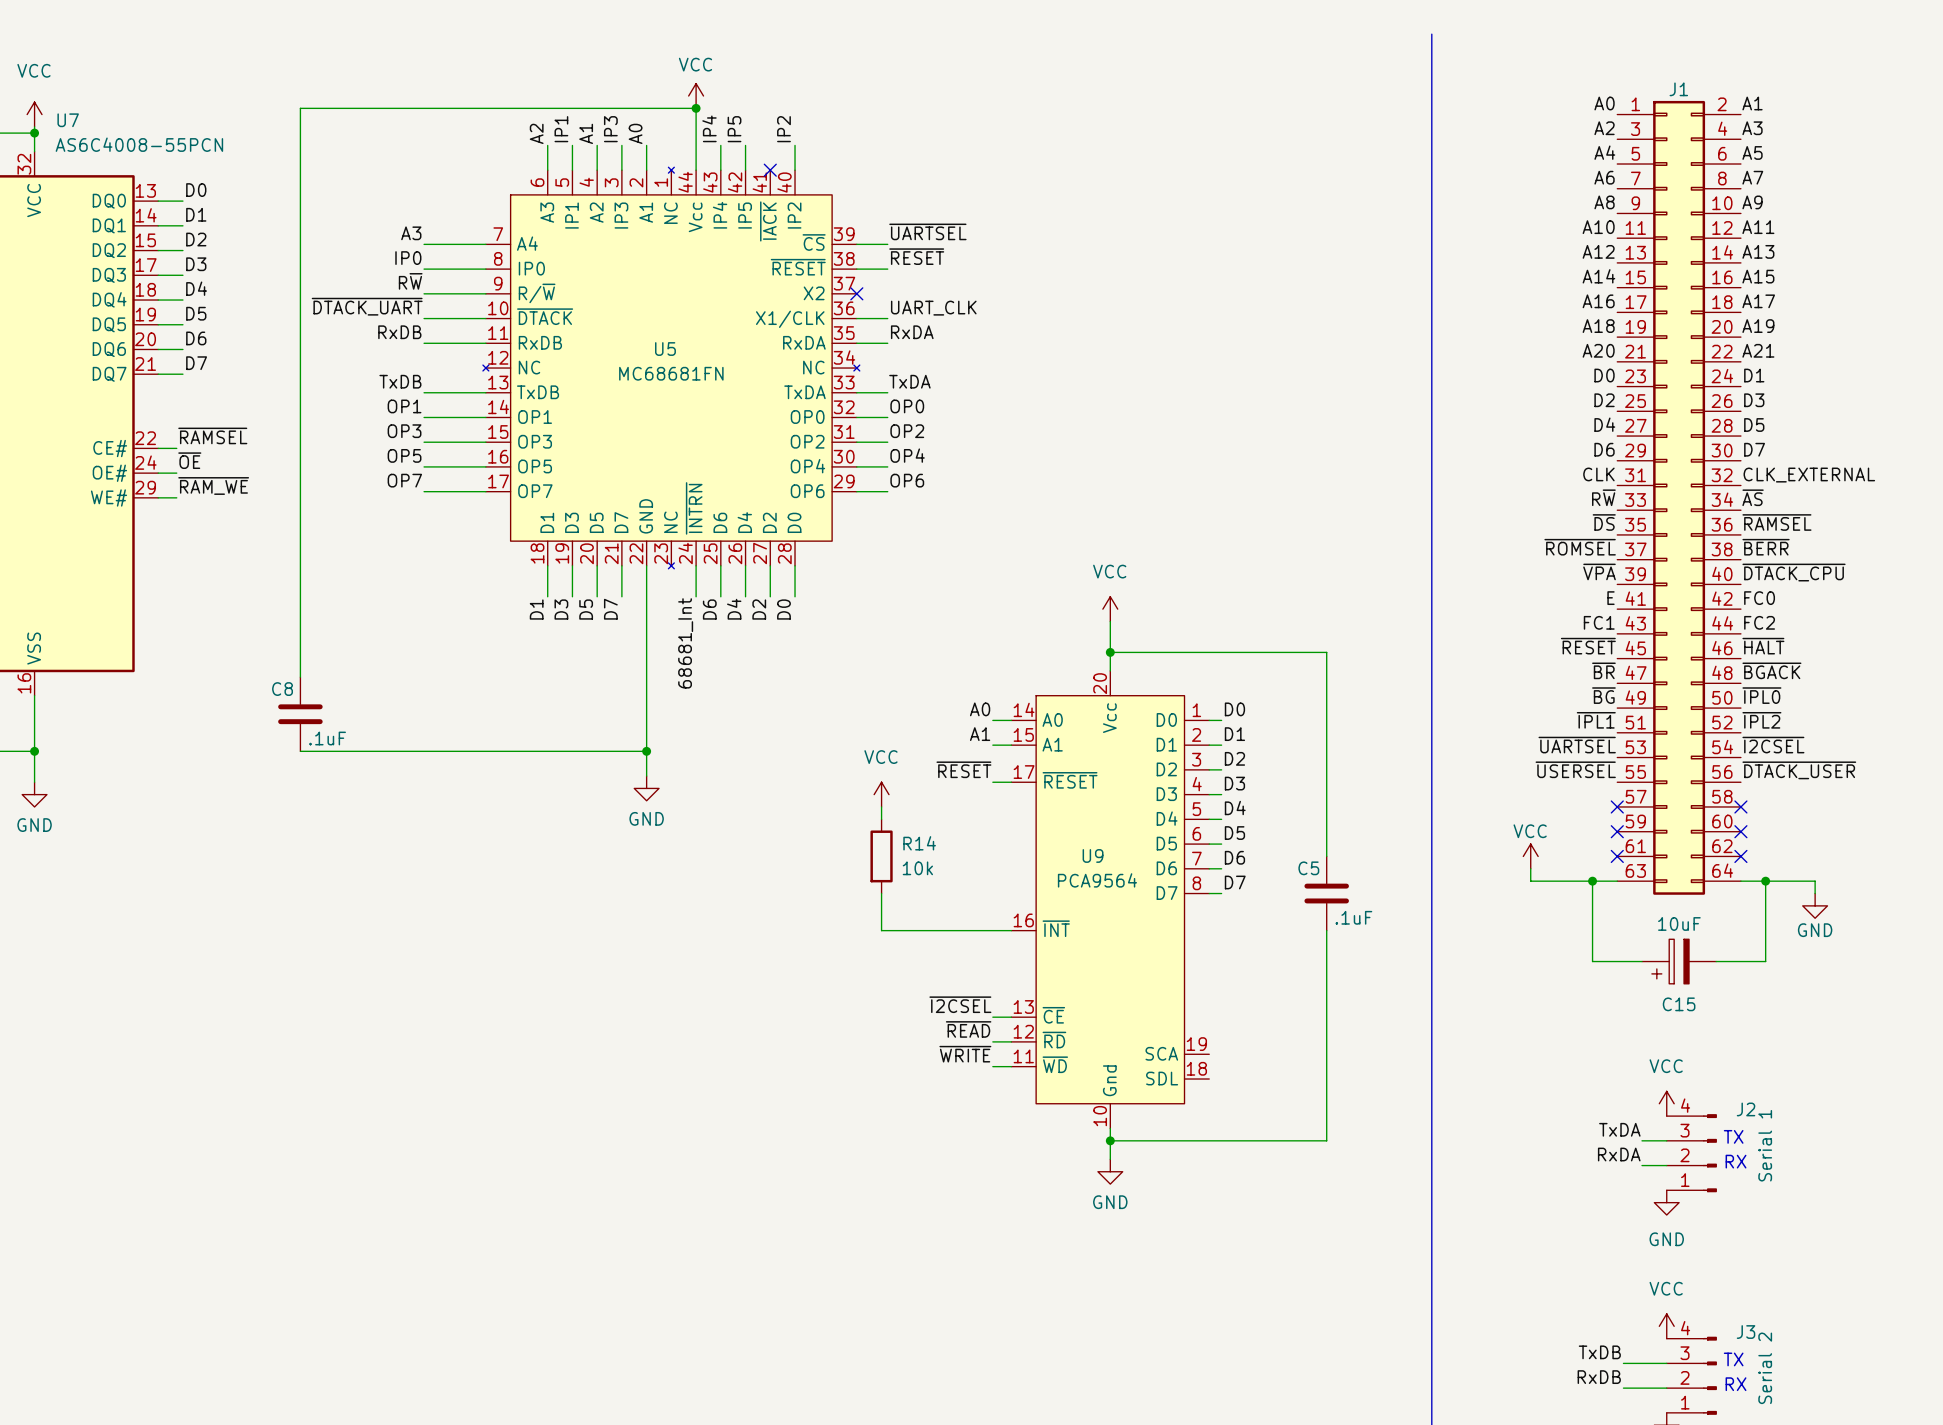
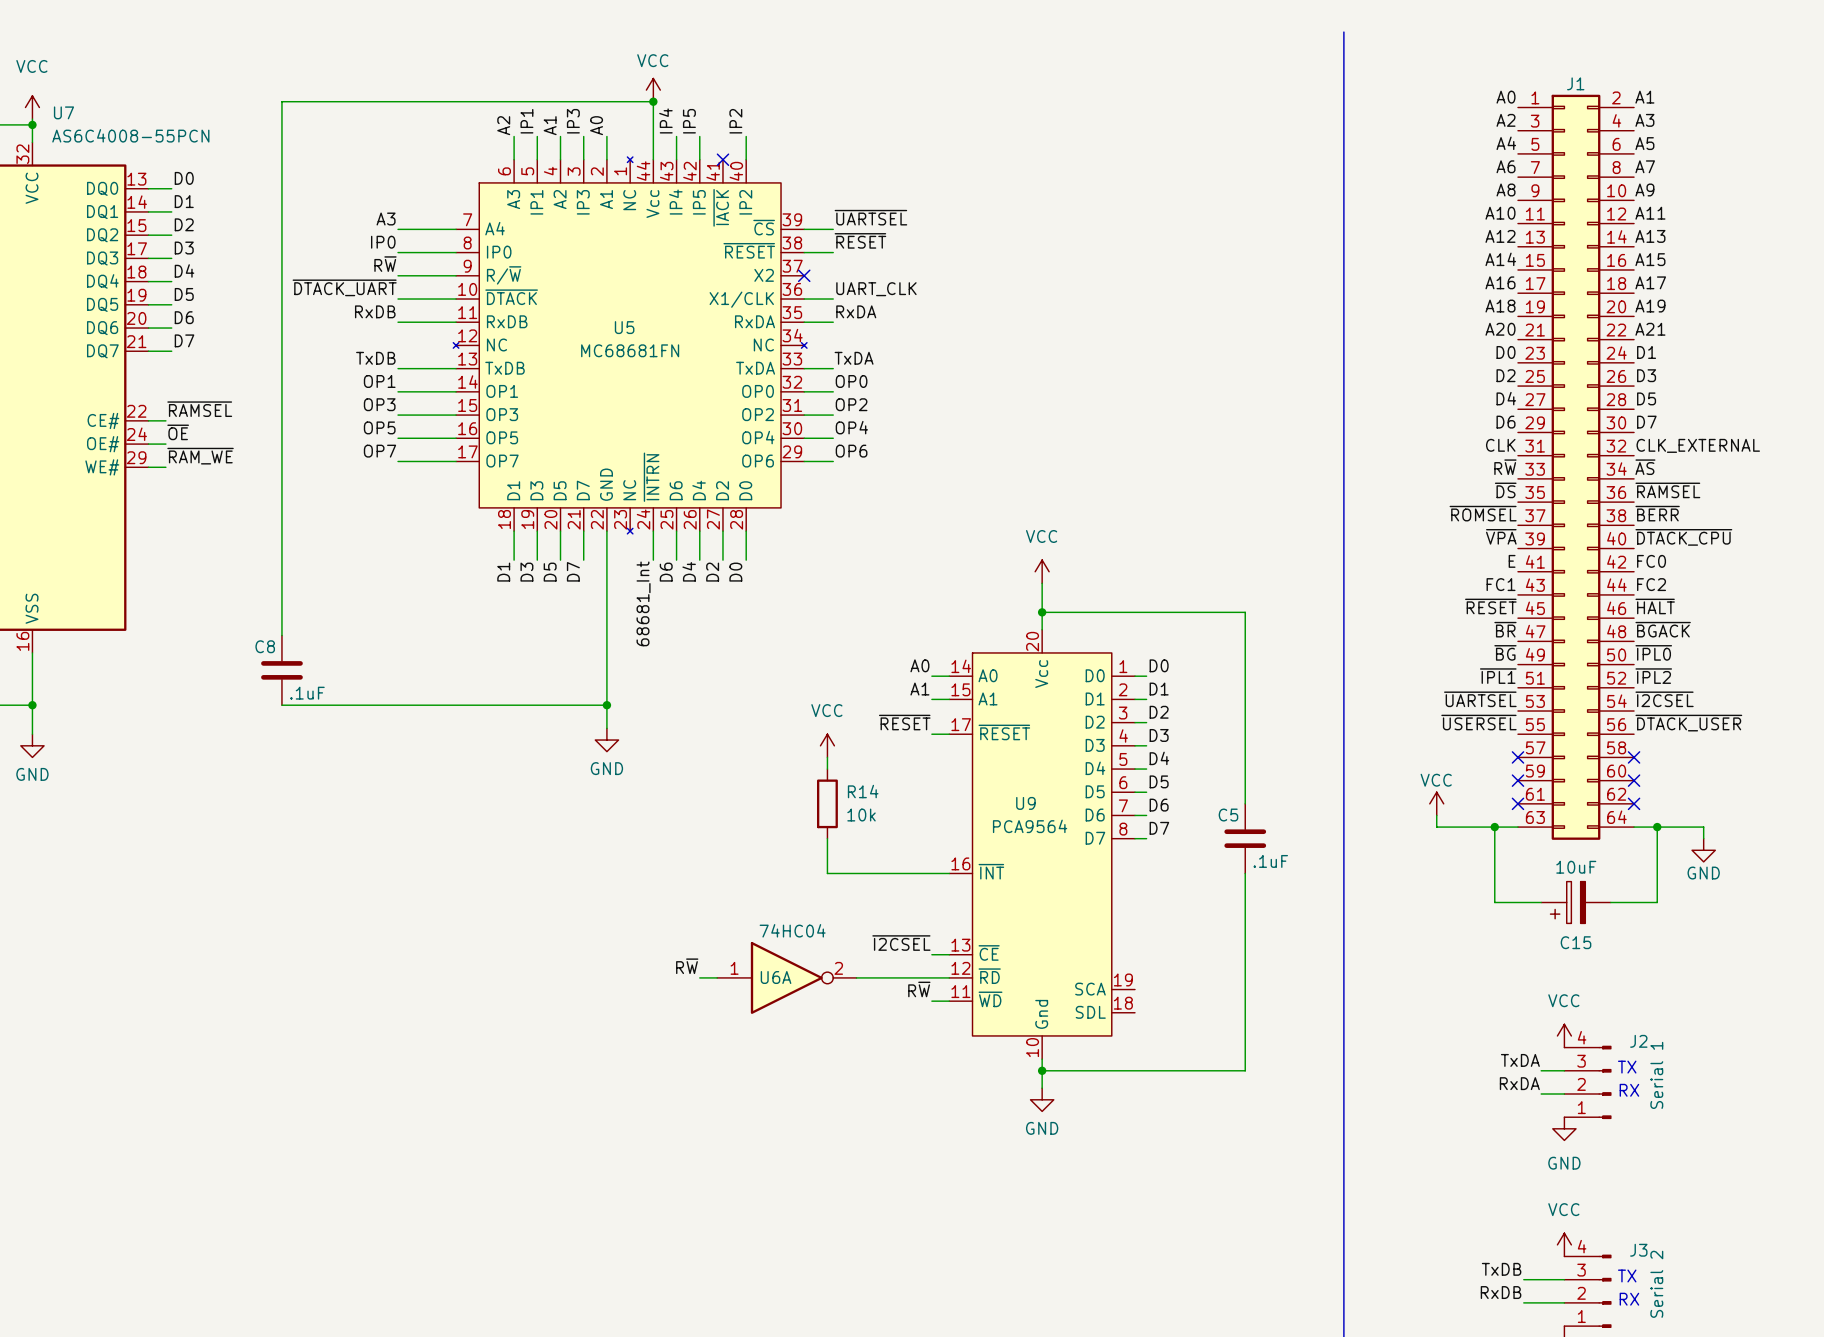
label: none -> R~{W} (687, 966)
label: ~{READ} (968, 1029) -> none
wire: none -> (699, 977) (717, 977)
U6A: none -> 74HC04 (786, 977)
wire: none -> (856, 977) (931, 977)
label: ~{WRITE} (965, 1054) -> R~{W} (919, 989)

